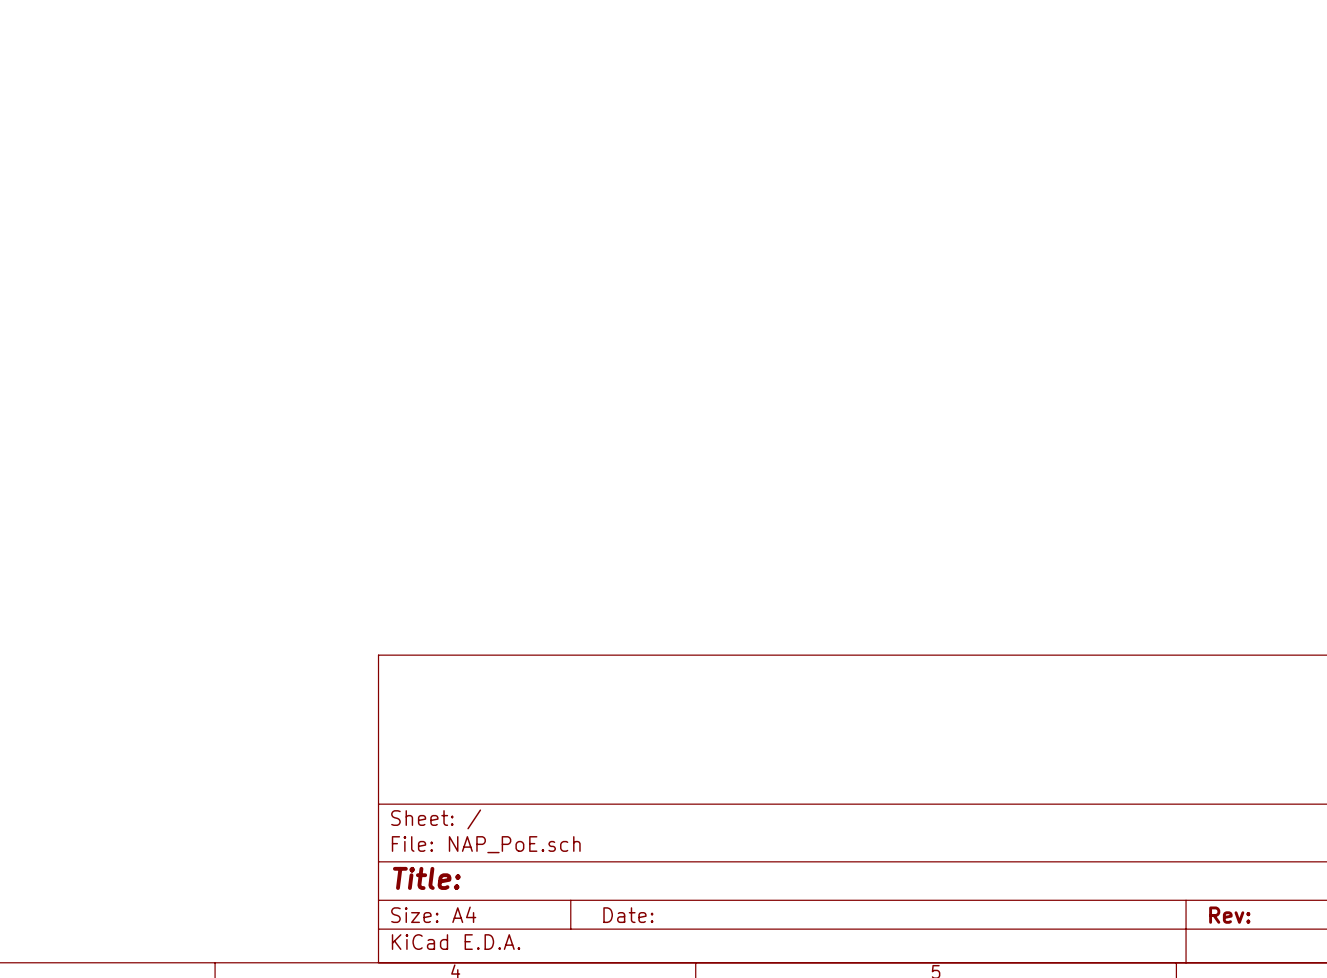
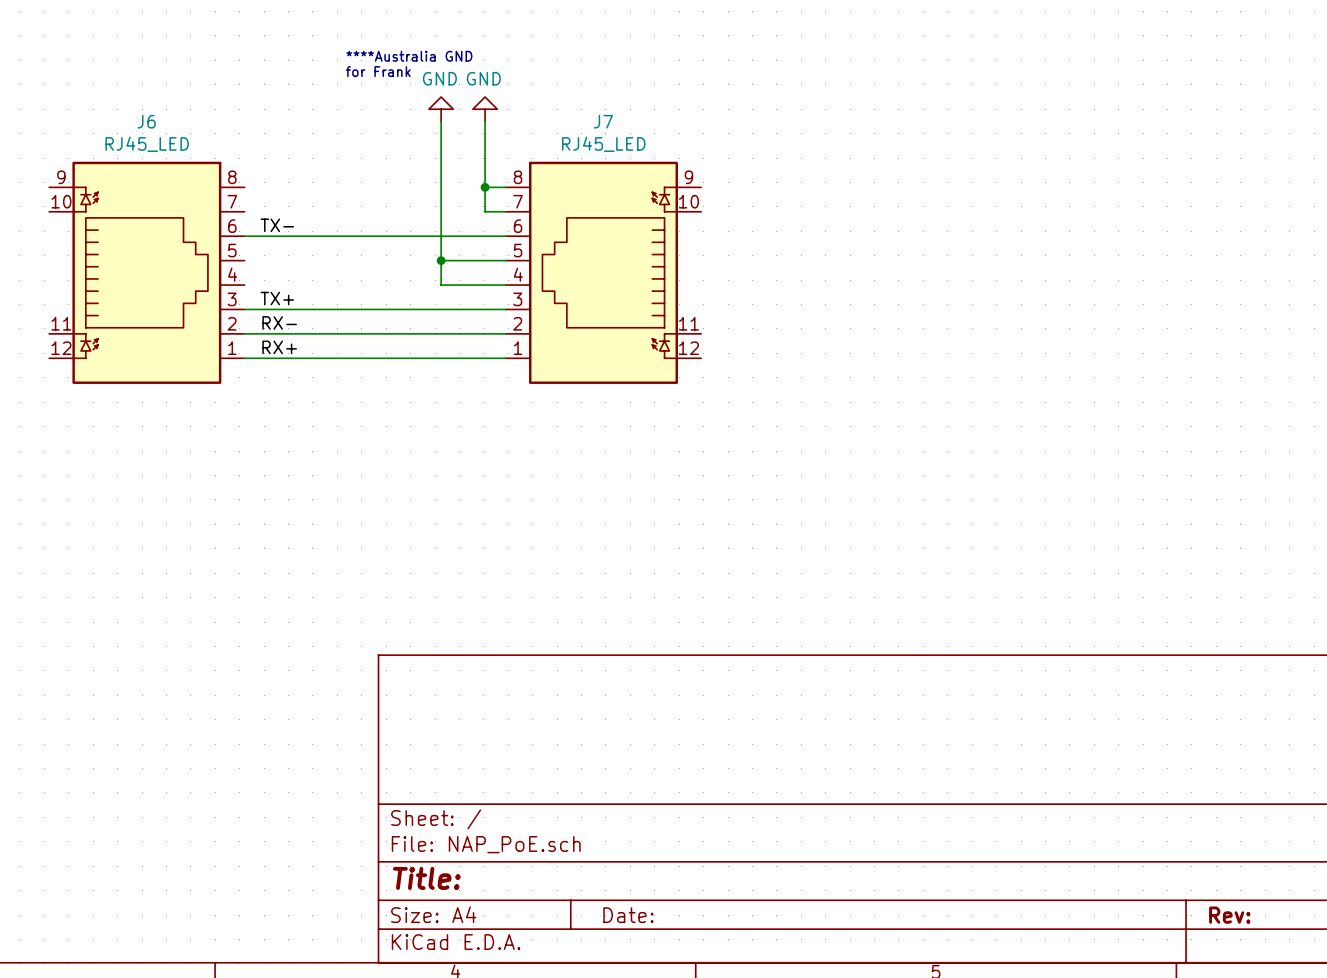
text: none -> ****Australia GND (409, 56)
text: none -> for Frank (378, 71)
power symbol: none -> GND (441, 109)
power symbol: none -> GND (485, 109)
wire: none -> (441, 121) (441, 285) (505, 285)
wire: none -> (485, 121) (485, 211) (505, 211)
wire: none -> (485, 187) (505, 187)
junction: none -> (485, 187)
label: none -> TX- (277, 225)
wire: none -> (244, 236) (505, 236)
wire: none -> (441, 260) (505, 260)
junction: none -> (441, 260)
J6: none -> RJ45_LED (146, 272)
J7: none -> RJ45_LED (603, 272)
label: none -> TX+ (277, 298)
wire: none -> (244, 309) (505, 309)
label: none -> RX- (279, 322)
wire: none -> (244, 333) (505, 333)
label: none -> RX+ (279, 347)
wire: none -> (244, 358) (505, 358)

